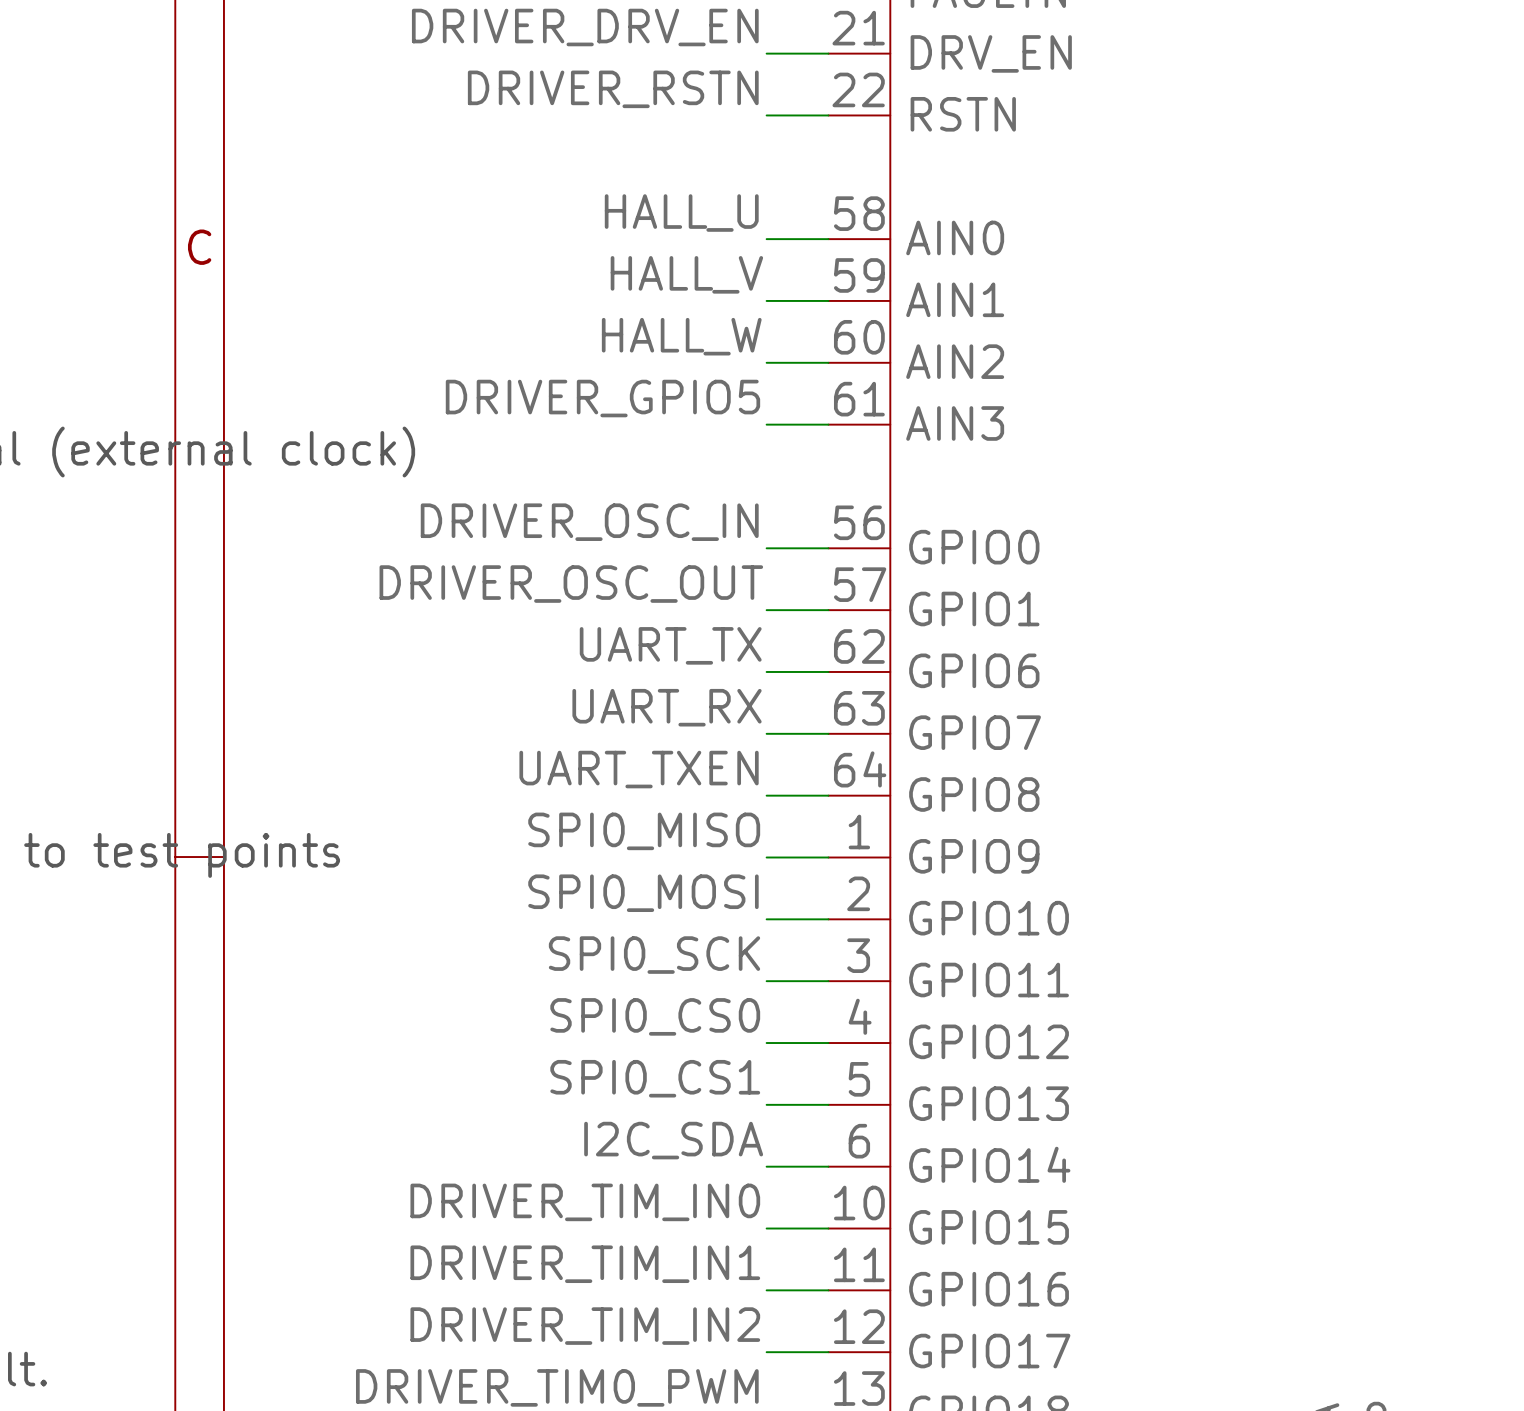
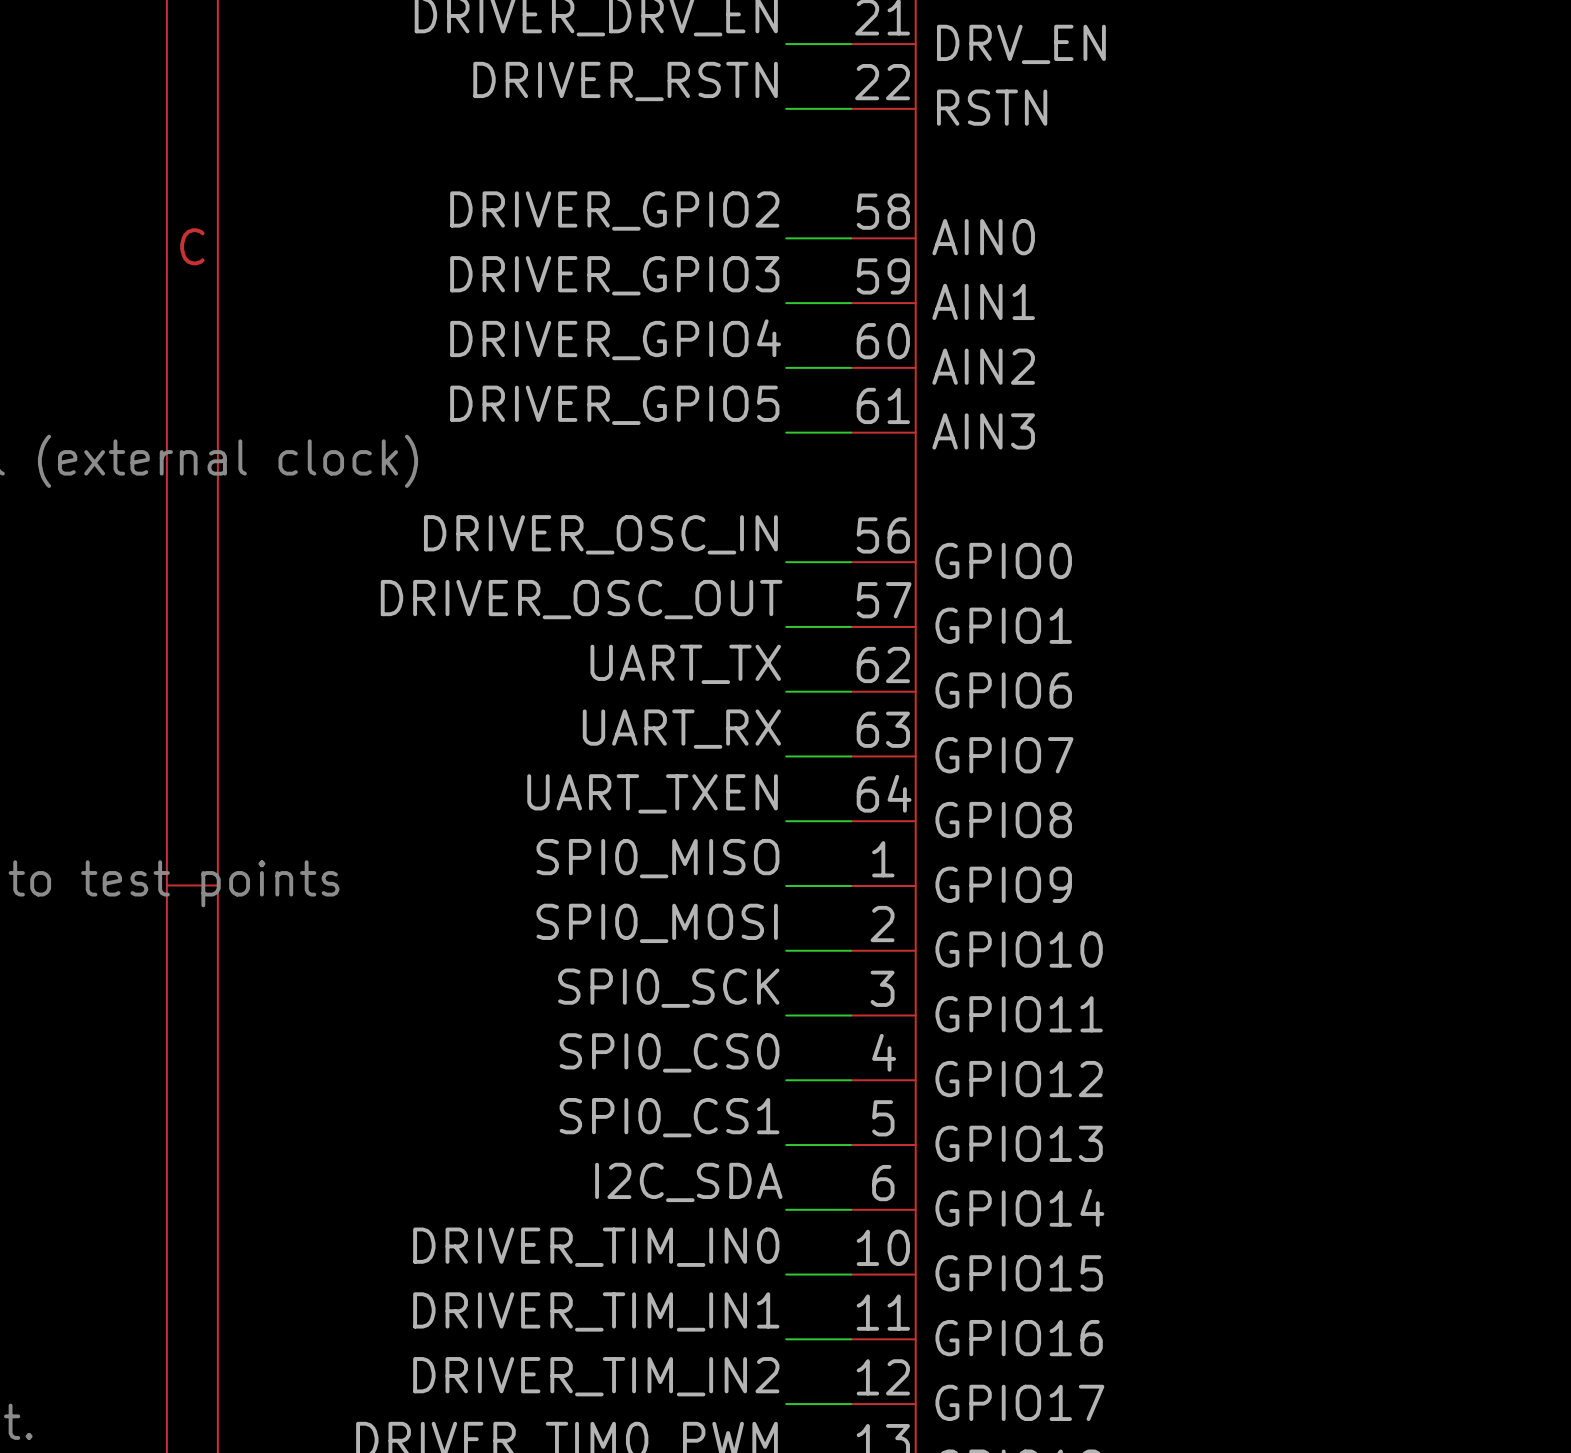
label: HALL_U (681, 213) -> DRIVER_GPIO2 (614, 211)
label: HALL_V (686, 274) -> DRIVER_GPIO3 (614, 275)
label: HALL_W (681, 336) -> DRIVER_GPIO4 (615, 339)

